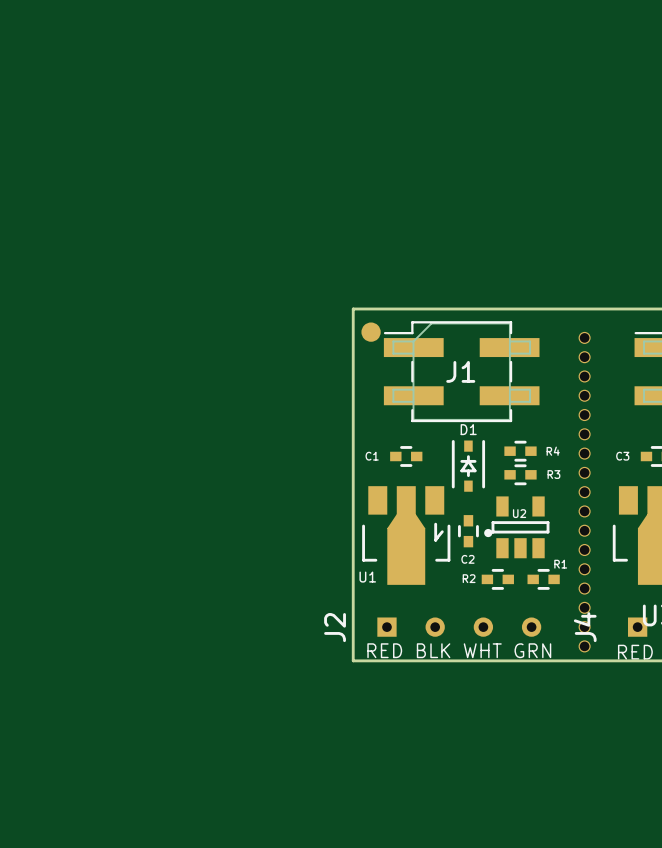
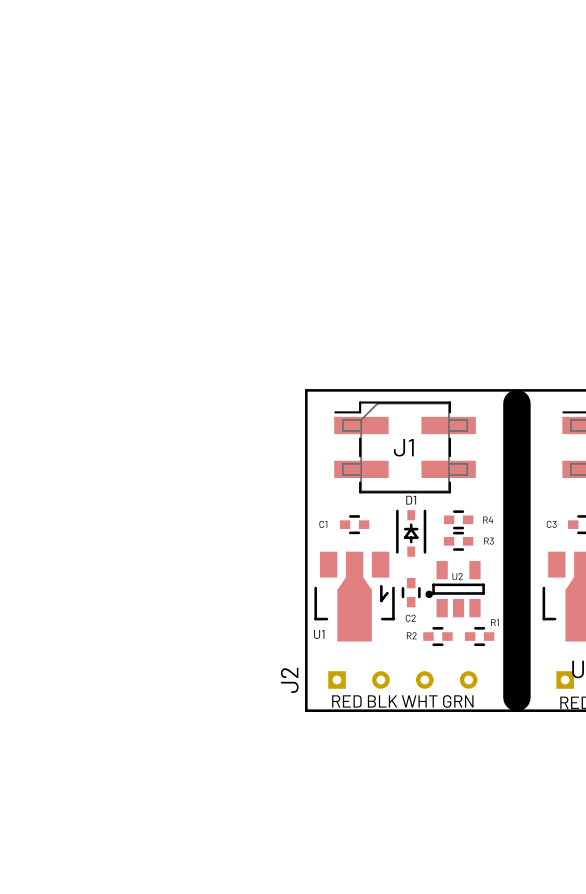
line: none -> (516, 403) (516, 697)
part: (371, 332) -> none
part: (584, 337) -> none
part: (584, 357) -> none
part: (584, 415) -> none
part: (584, 511) -> none
part: (584, 607) -> none

